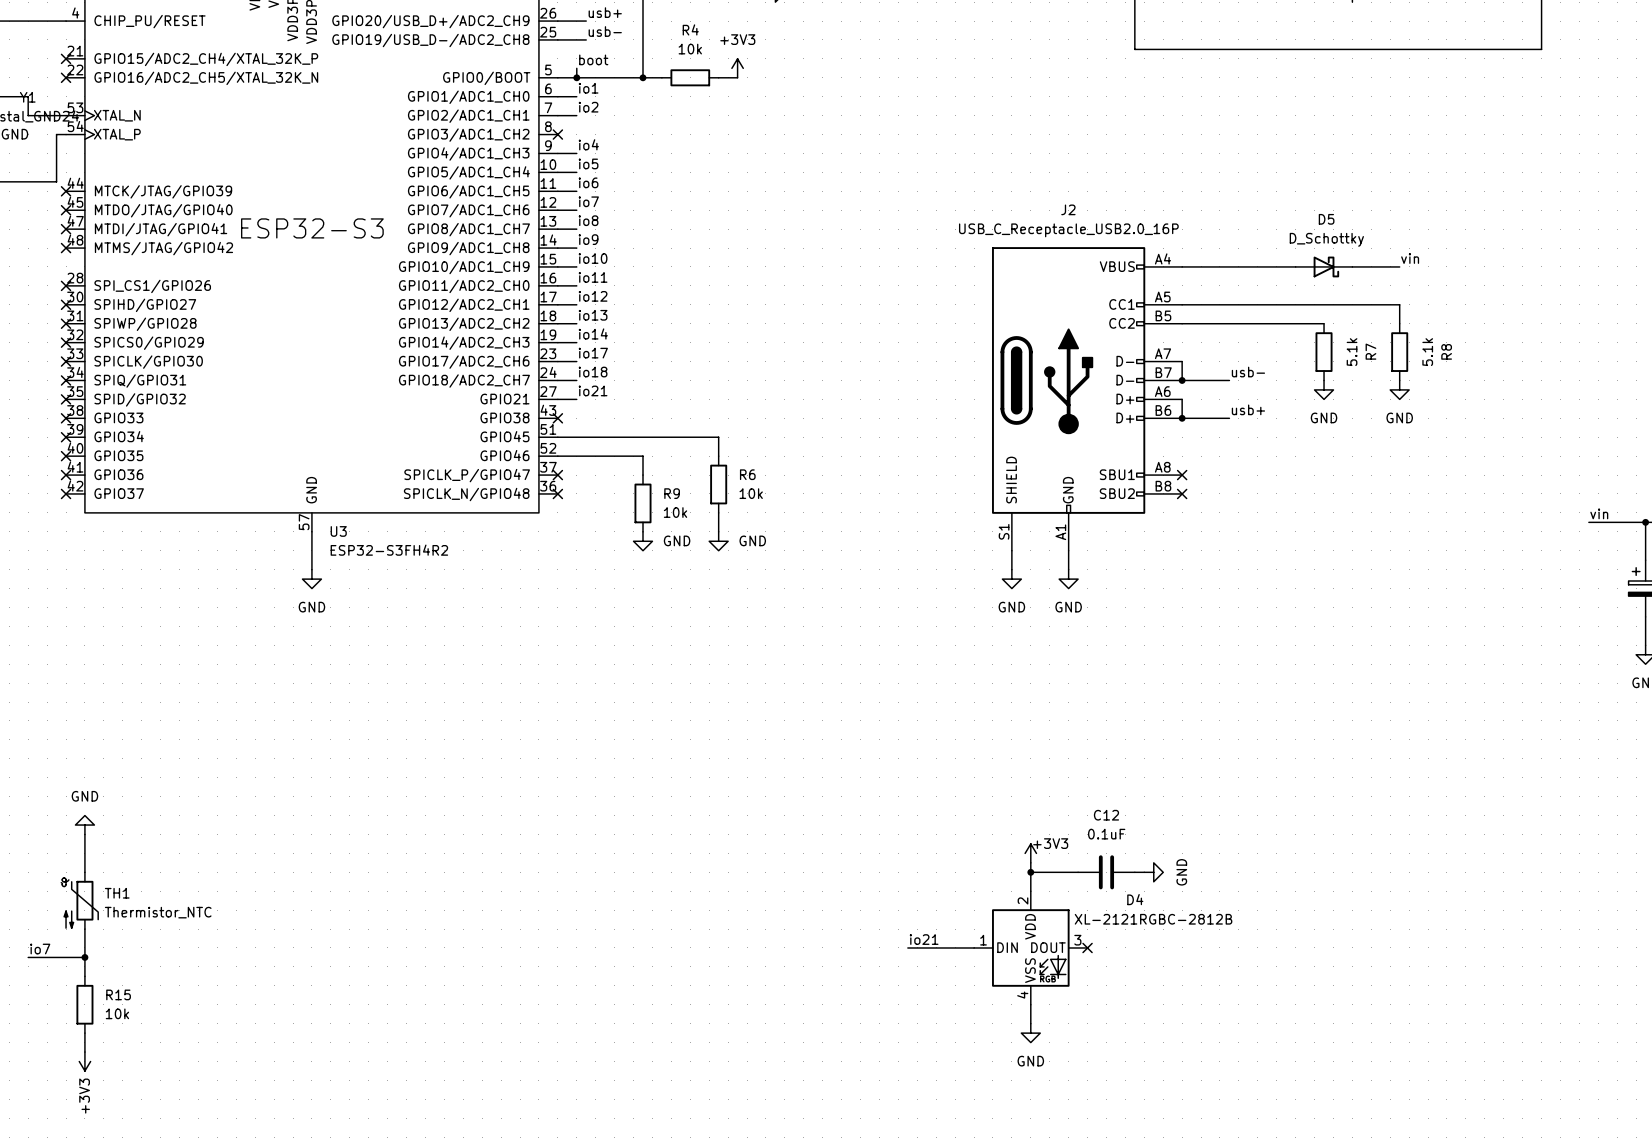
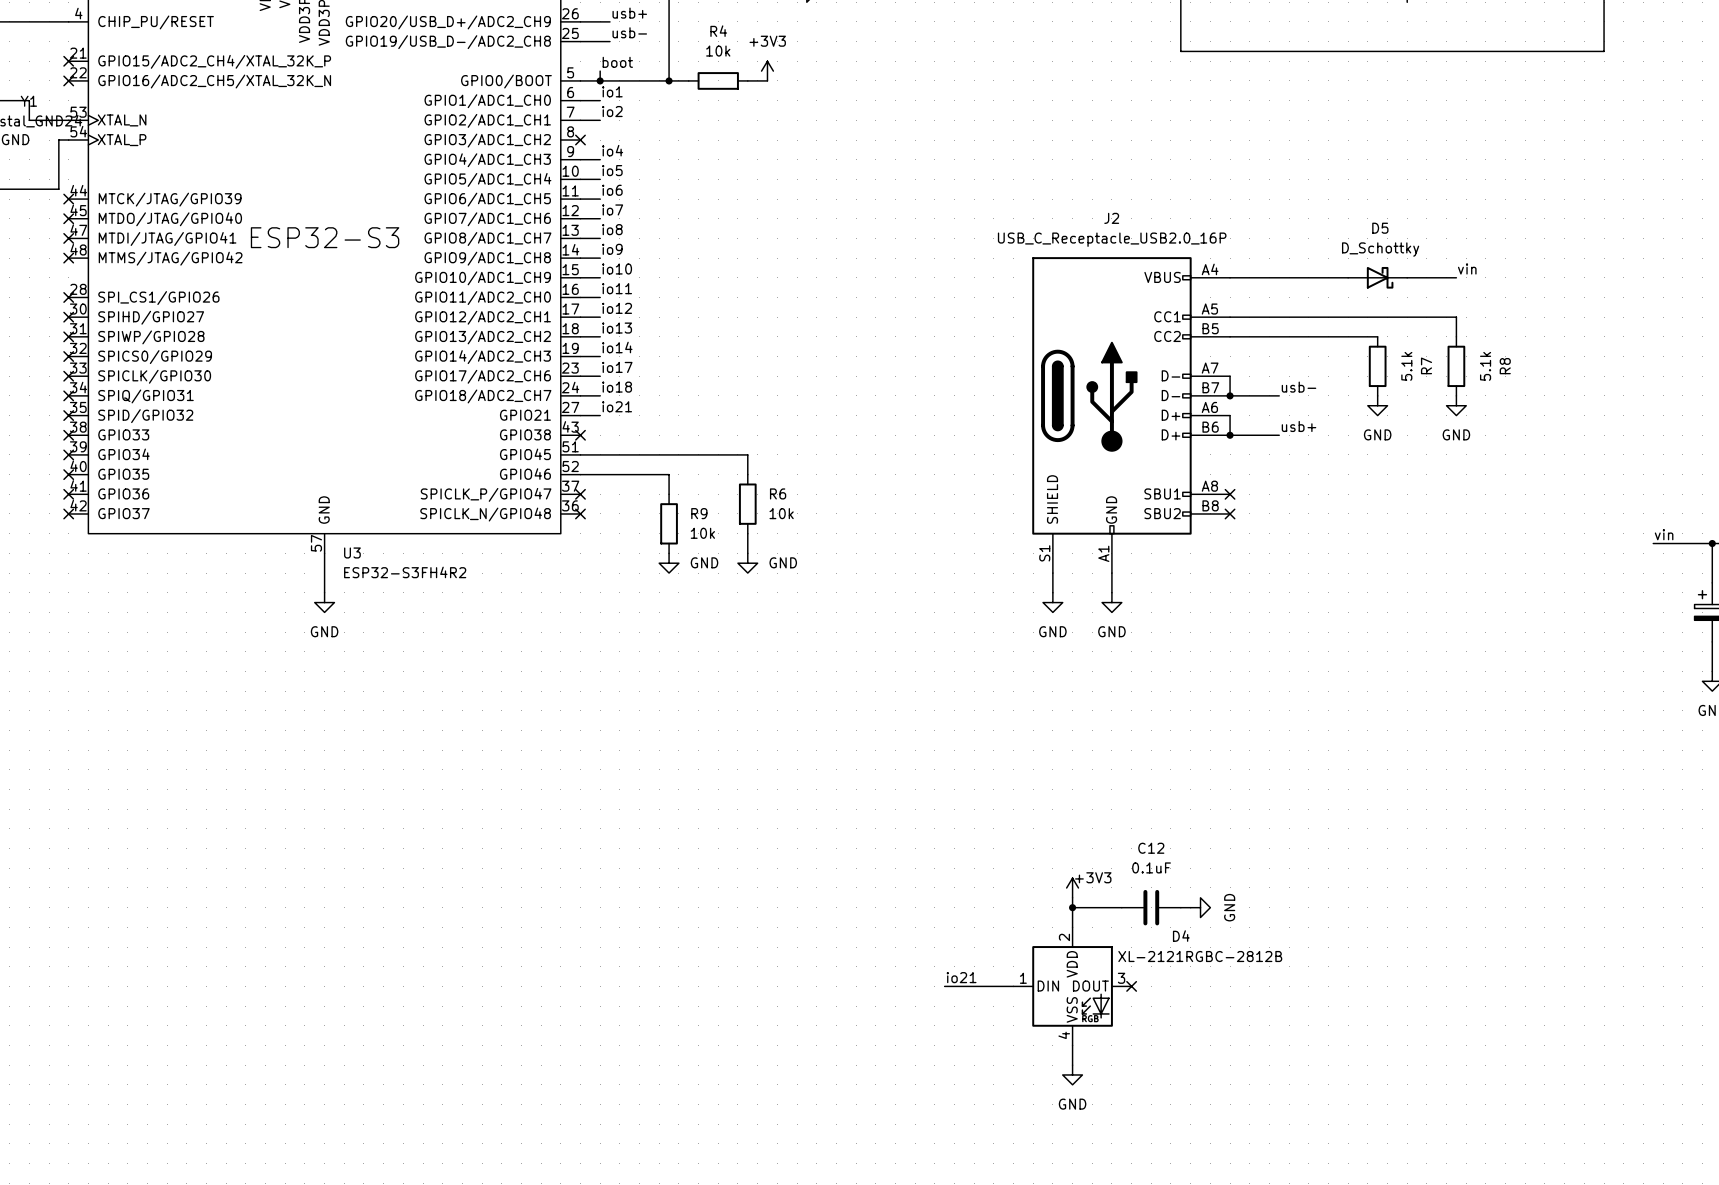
power symbol: GND (84, 825) -> none
wire: (84, 834) (84, 872) -> none
TH1: Thermistor_NTC (79, 900) -> none
wire: (84, 929) (84, 976) -> none
label: io7 (40, 949) -> none
wire: (28, 957) (84, 957) -> none
junction: (84, 957) -> none
R15: 10k (84, 1004) -> none
wire: (84, 1033) (84, 1052) -> none
power symbol: +3V3 (84, 1061) -> none

